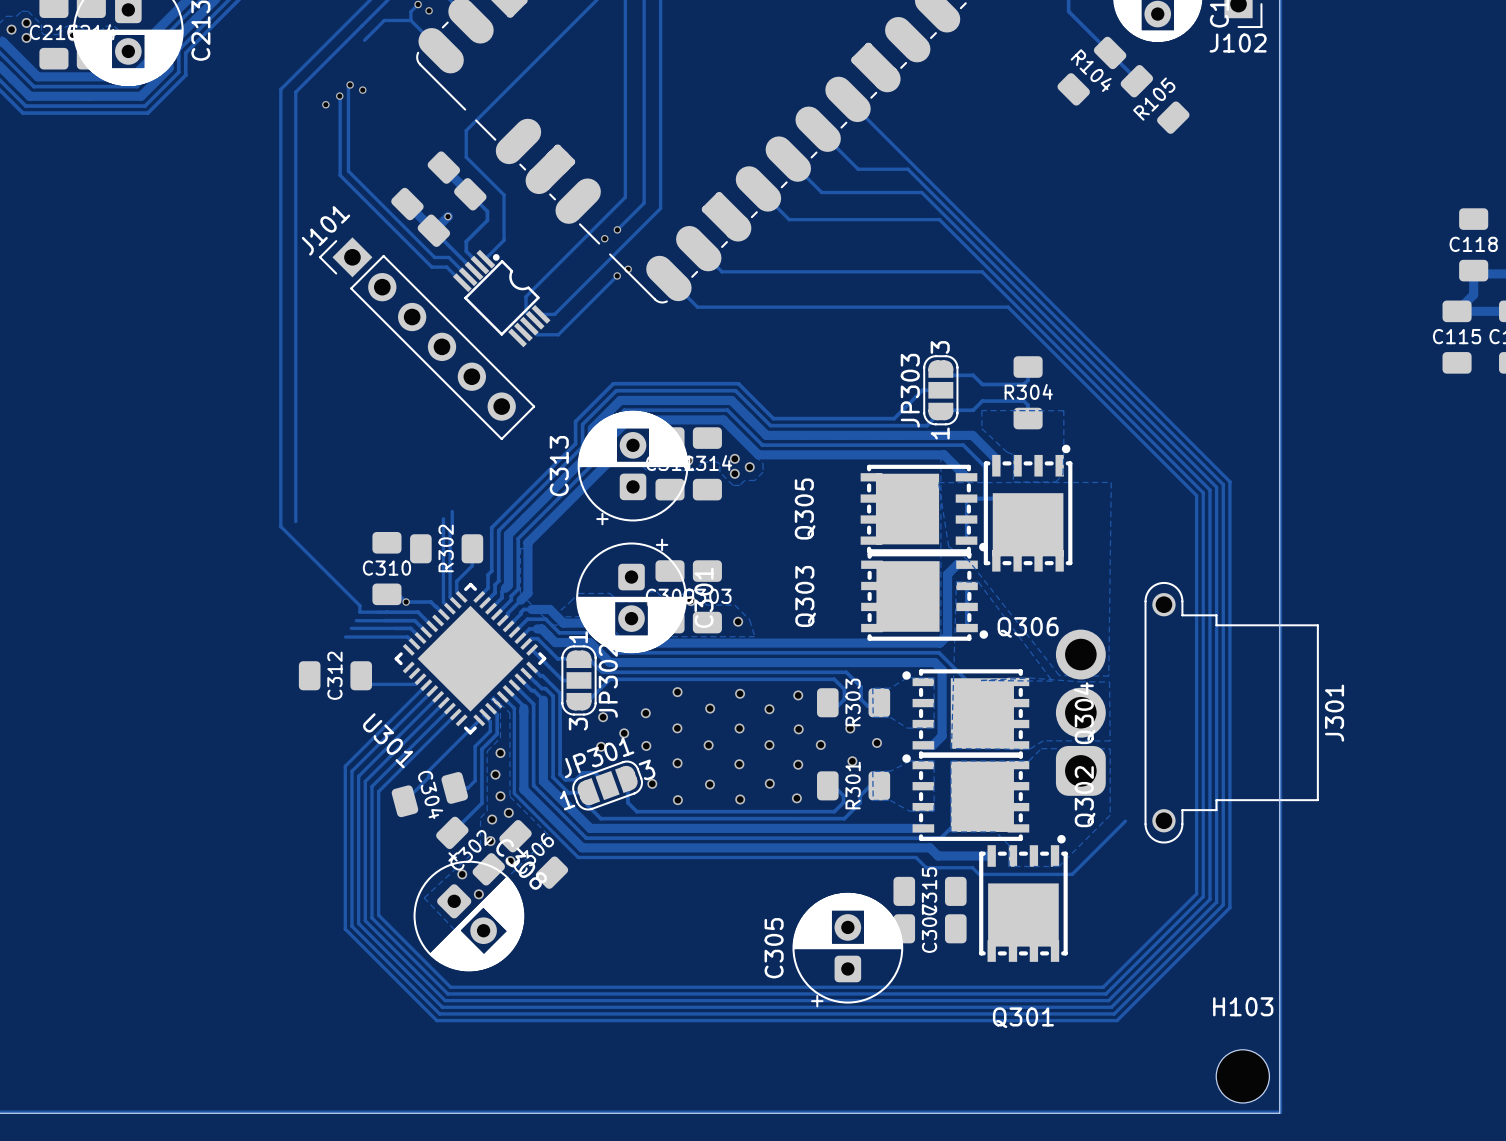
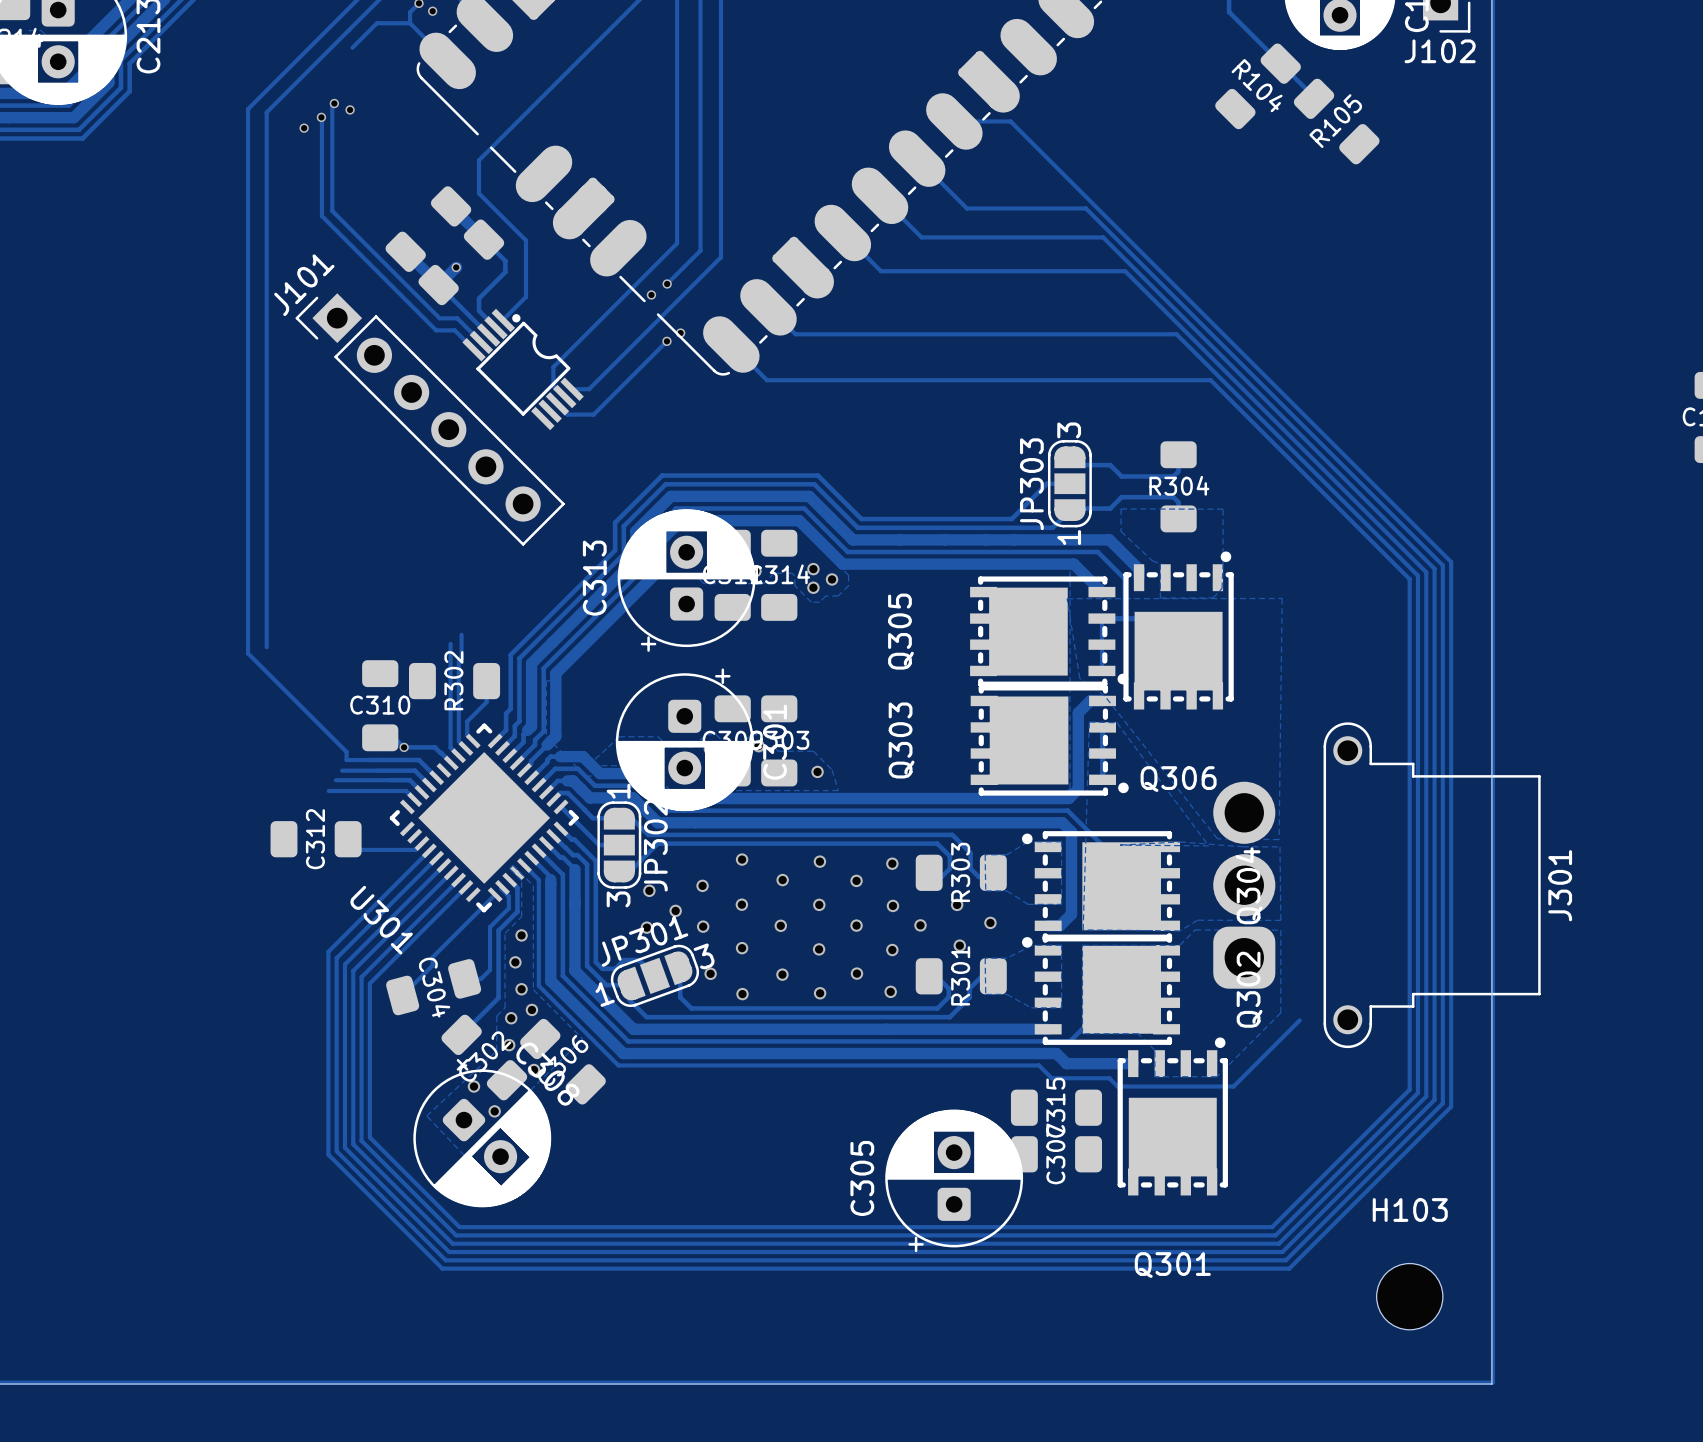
track: (848, 99) (1229, 481) (1229, 907) -> (954, 121) (1010, 121) (1451, 561) (1451, 1106) (1429, 1128)
track: (907, 169) (1223, 484) (1223, 904) -> (1029, 208) (1085, 208) (1442, 565) (1442, 1103) (1421, 1124)
track: (921, 192) (1216, 487) (1216, 902) -> (1046, 237) (1103, 237) (1434, 568) (1434, 1099) (1413, 1121)
track: (939, 219) (1209, 490) (1209, 899) -> (1068, 271) (1125, 271) (1426, 572) (1426, 1096) (1405, 1117)
track: (720, 270) (721, 271) (982, 271) (1203, 492) (1203, 896) -> (795, 334) (1176, 334) (1417, 575) (1417, 1093) (1396, 1114)
track: (1008, 307) (1196, 495) (1196, 893) -> (1153, 380) (1210, 380) (1409, 579) (1409, 1089) (1388, 1110)
H103 position: (1242, 1076) -> (1409, 1296)

